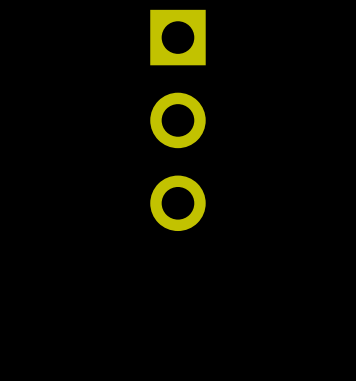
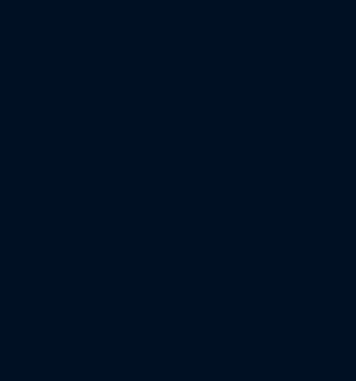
part: (177, 120) -> none

